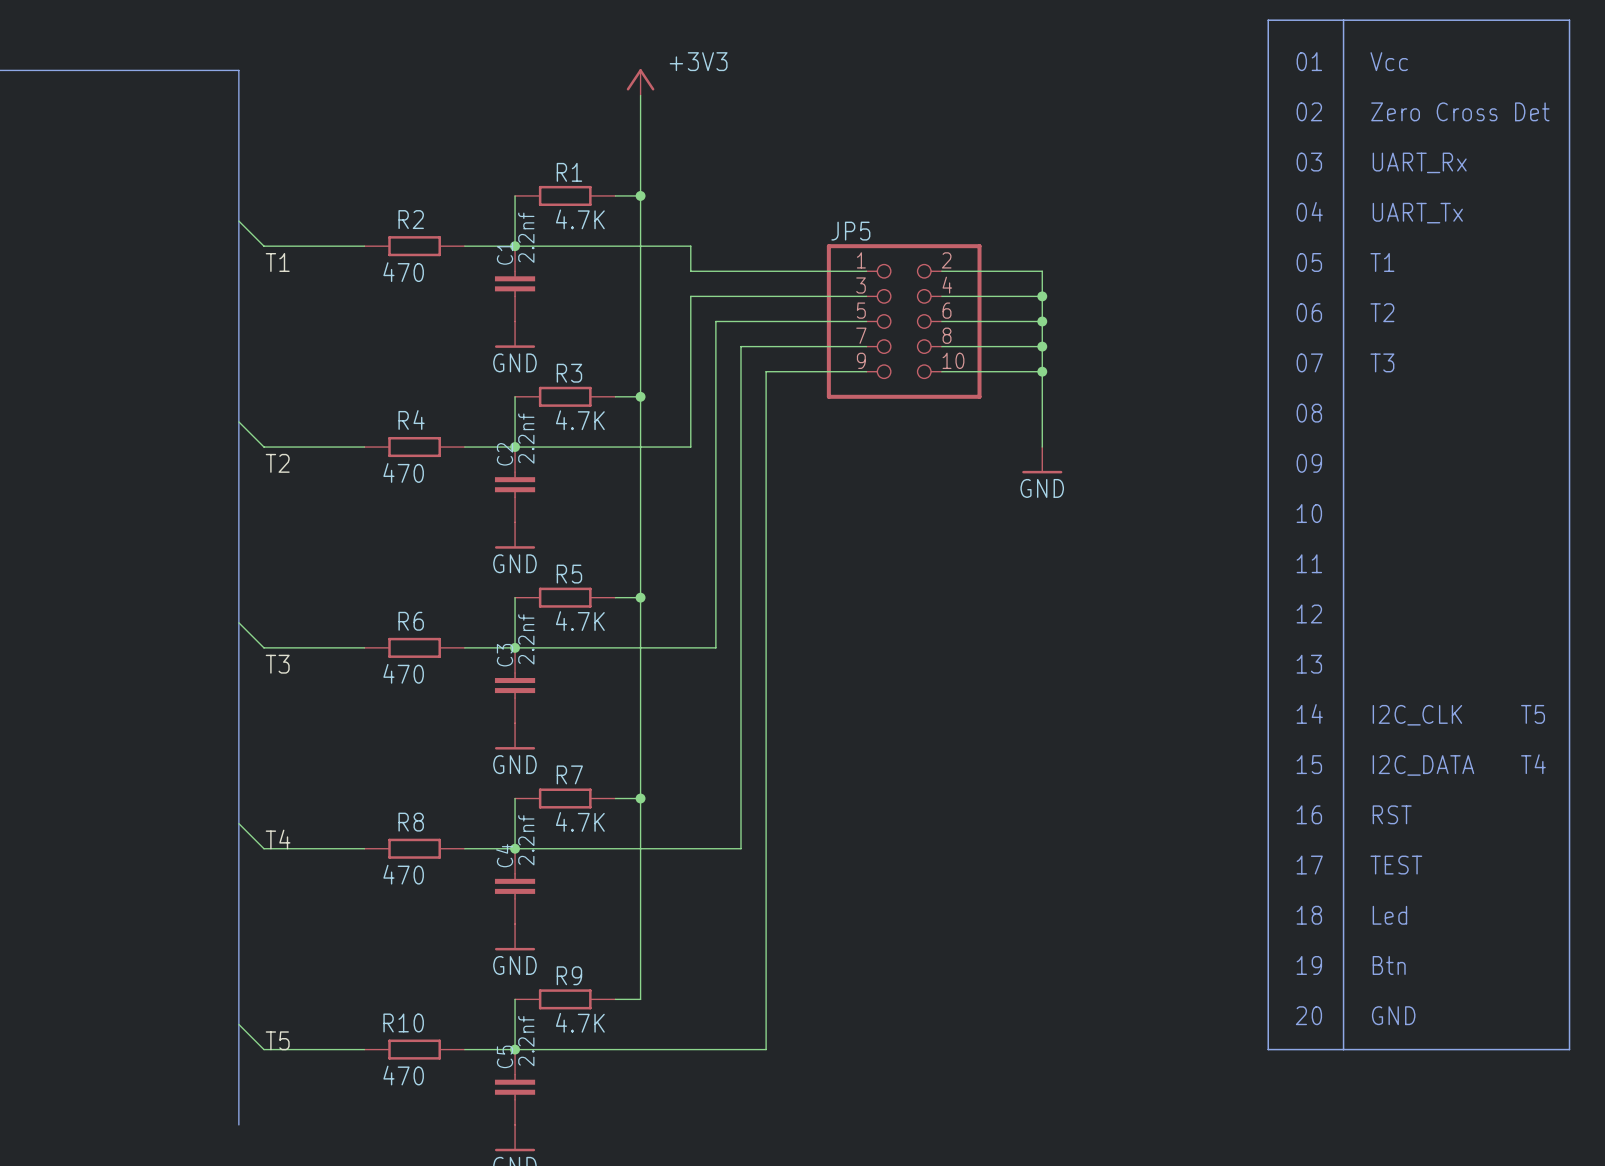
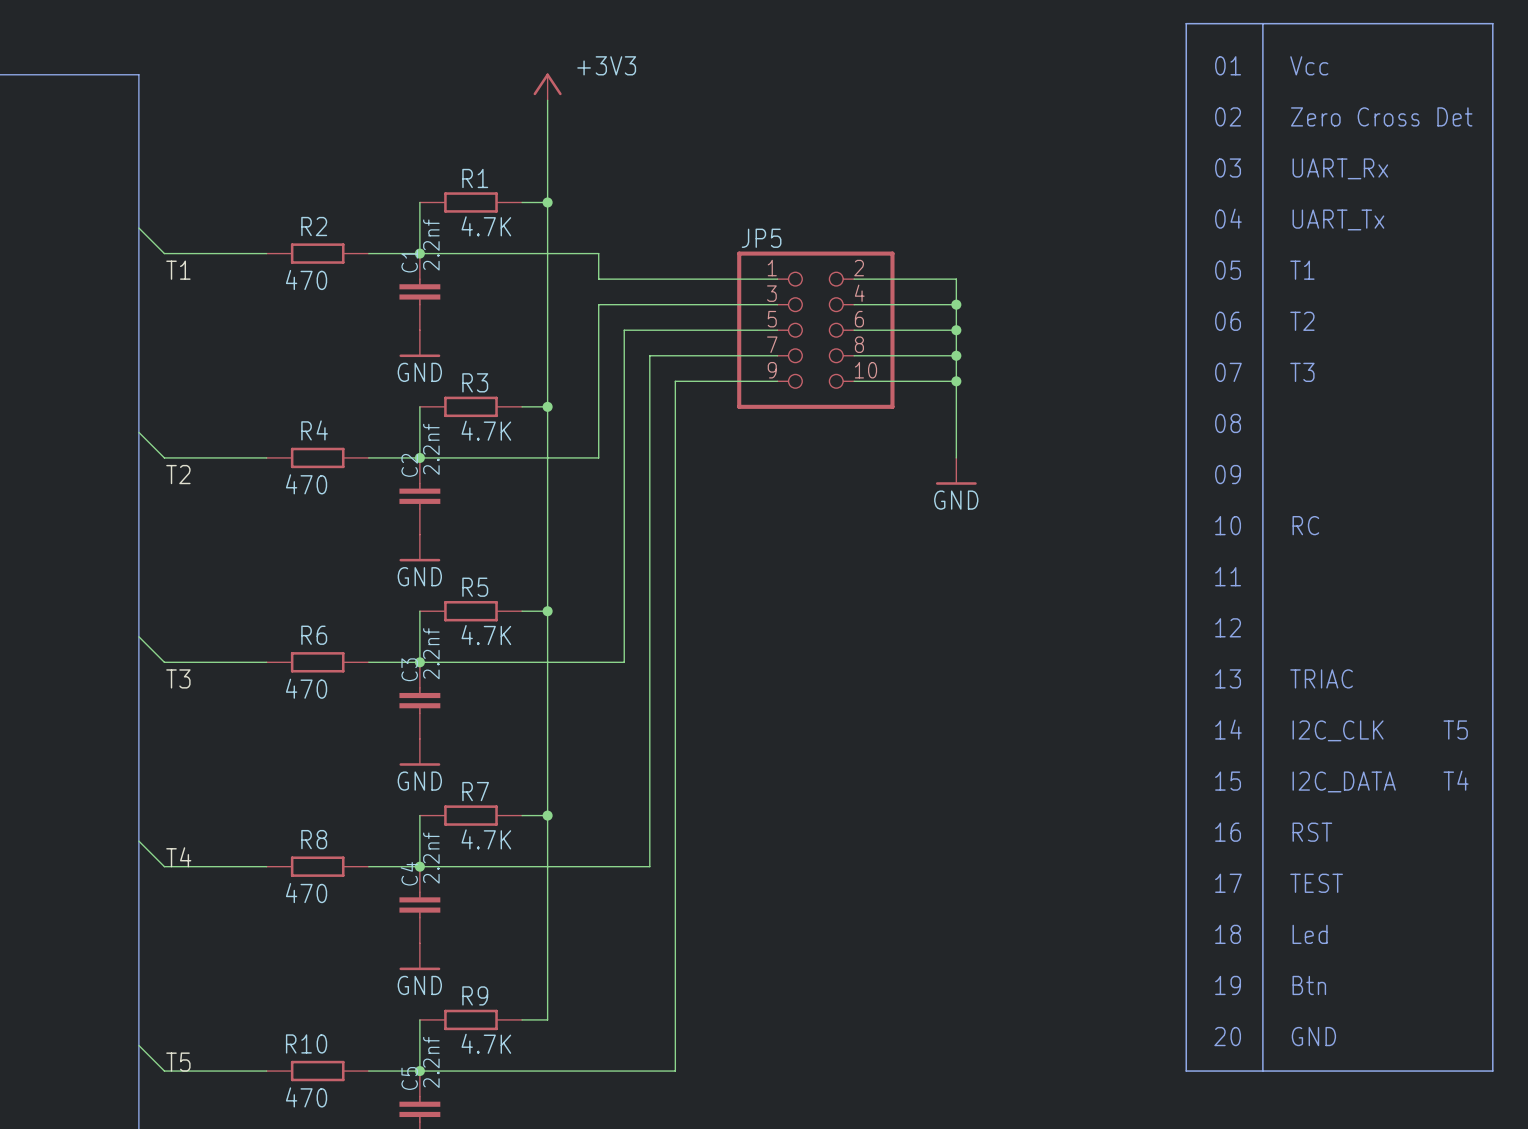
text: none -> RC (1305, 525)
text: none -> TRIAC (1321, 678)

